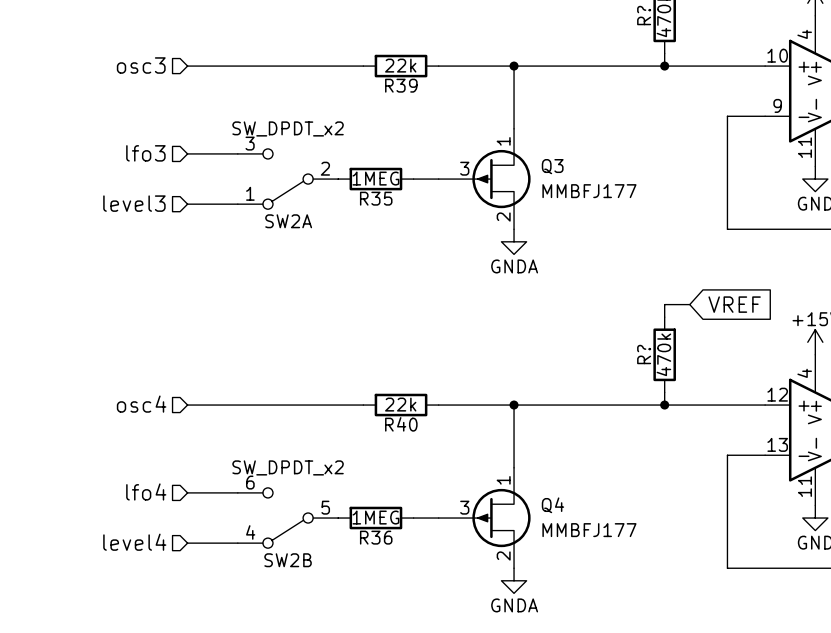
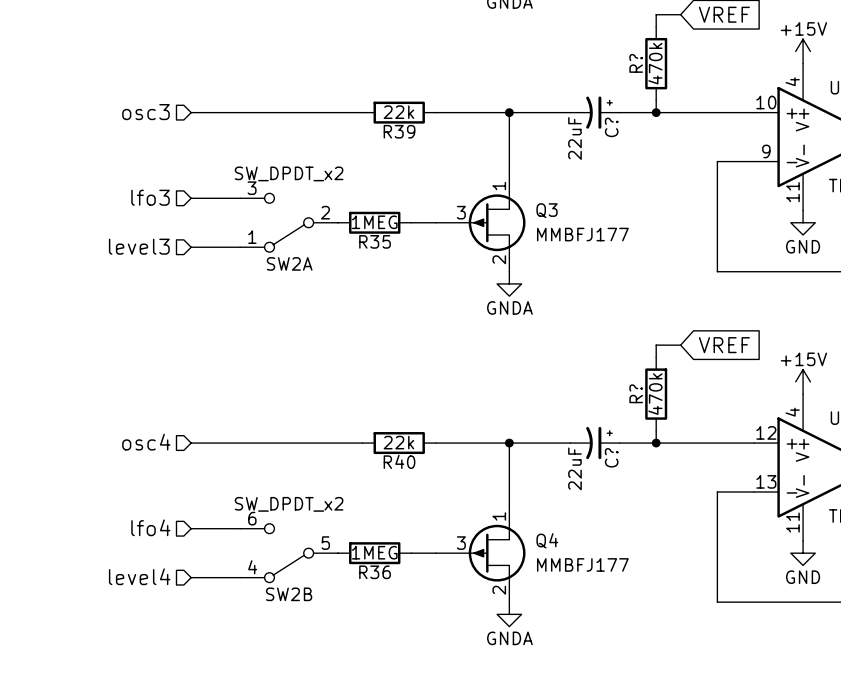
C?: none -> 22uF (595, 112)
C?: none -> 22uF (595, 443)

